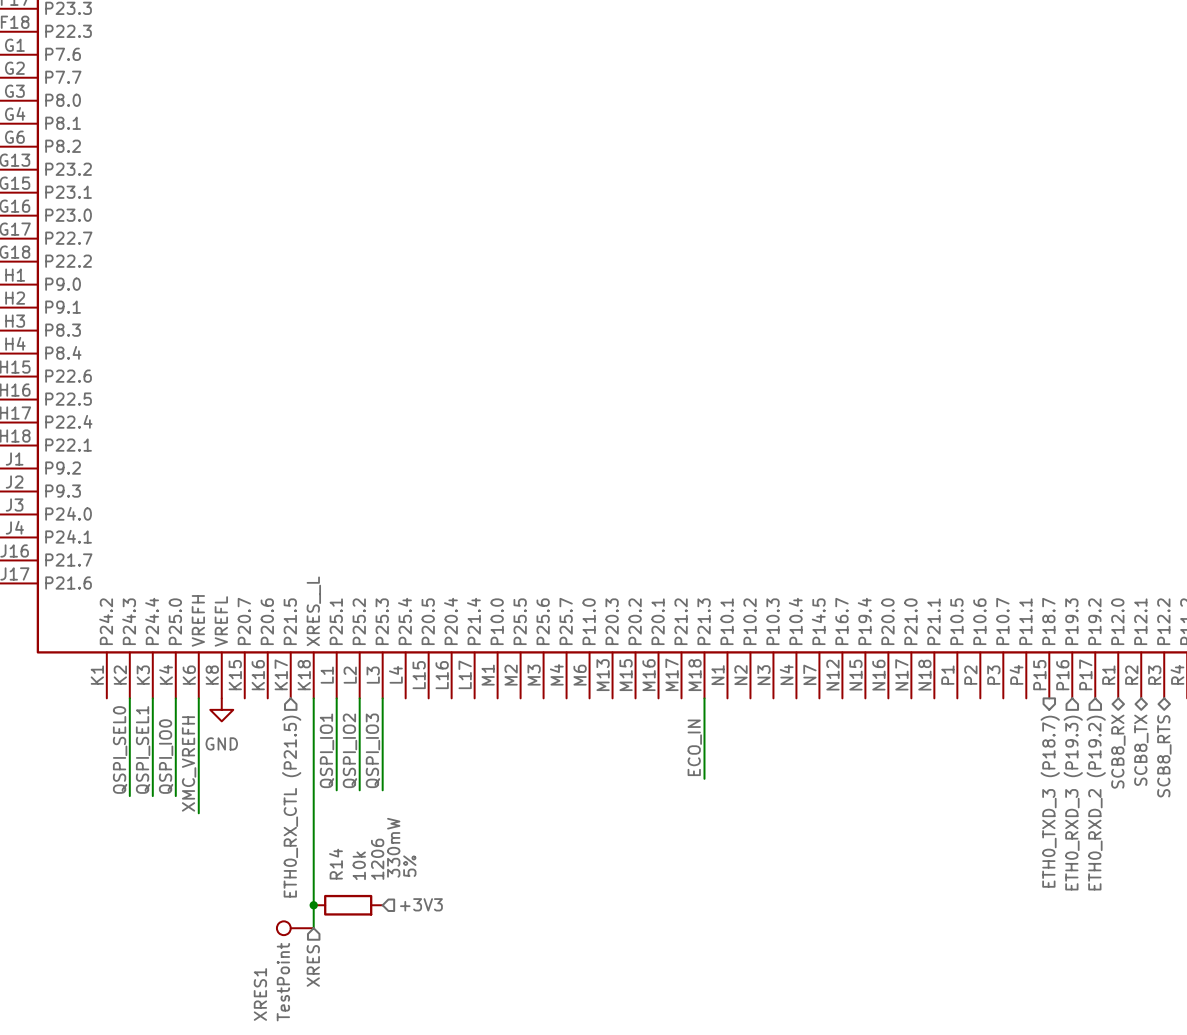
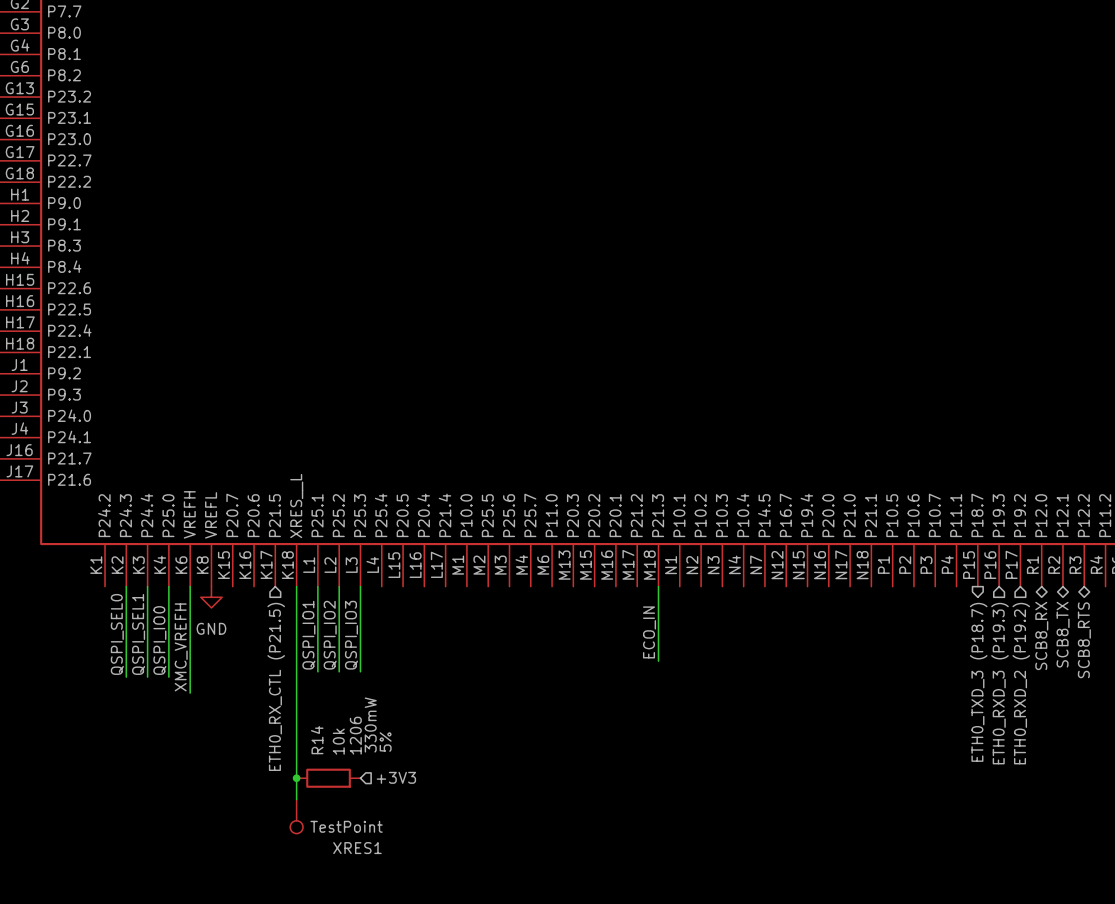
XRES1 rotation: 0° (283, 928) -> 90° counterclockwise (296, 827)
XRES1 position: (295, 928) -> (296, 816)
hierarchical label: XRES (313, 965) -> none

